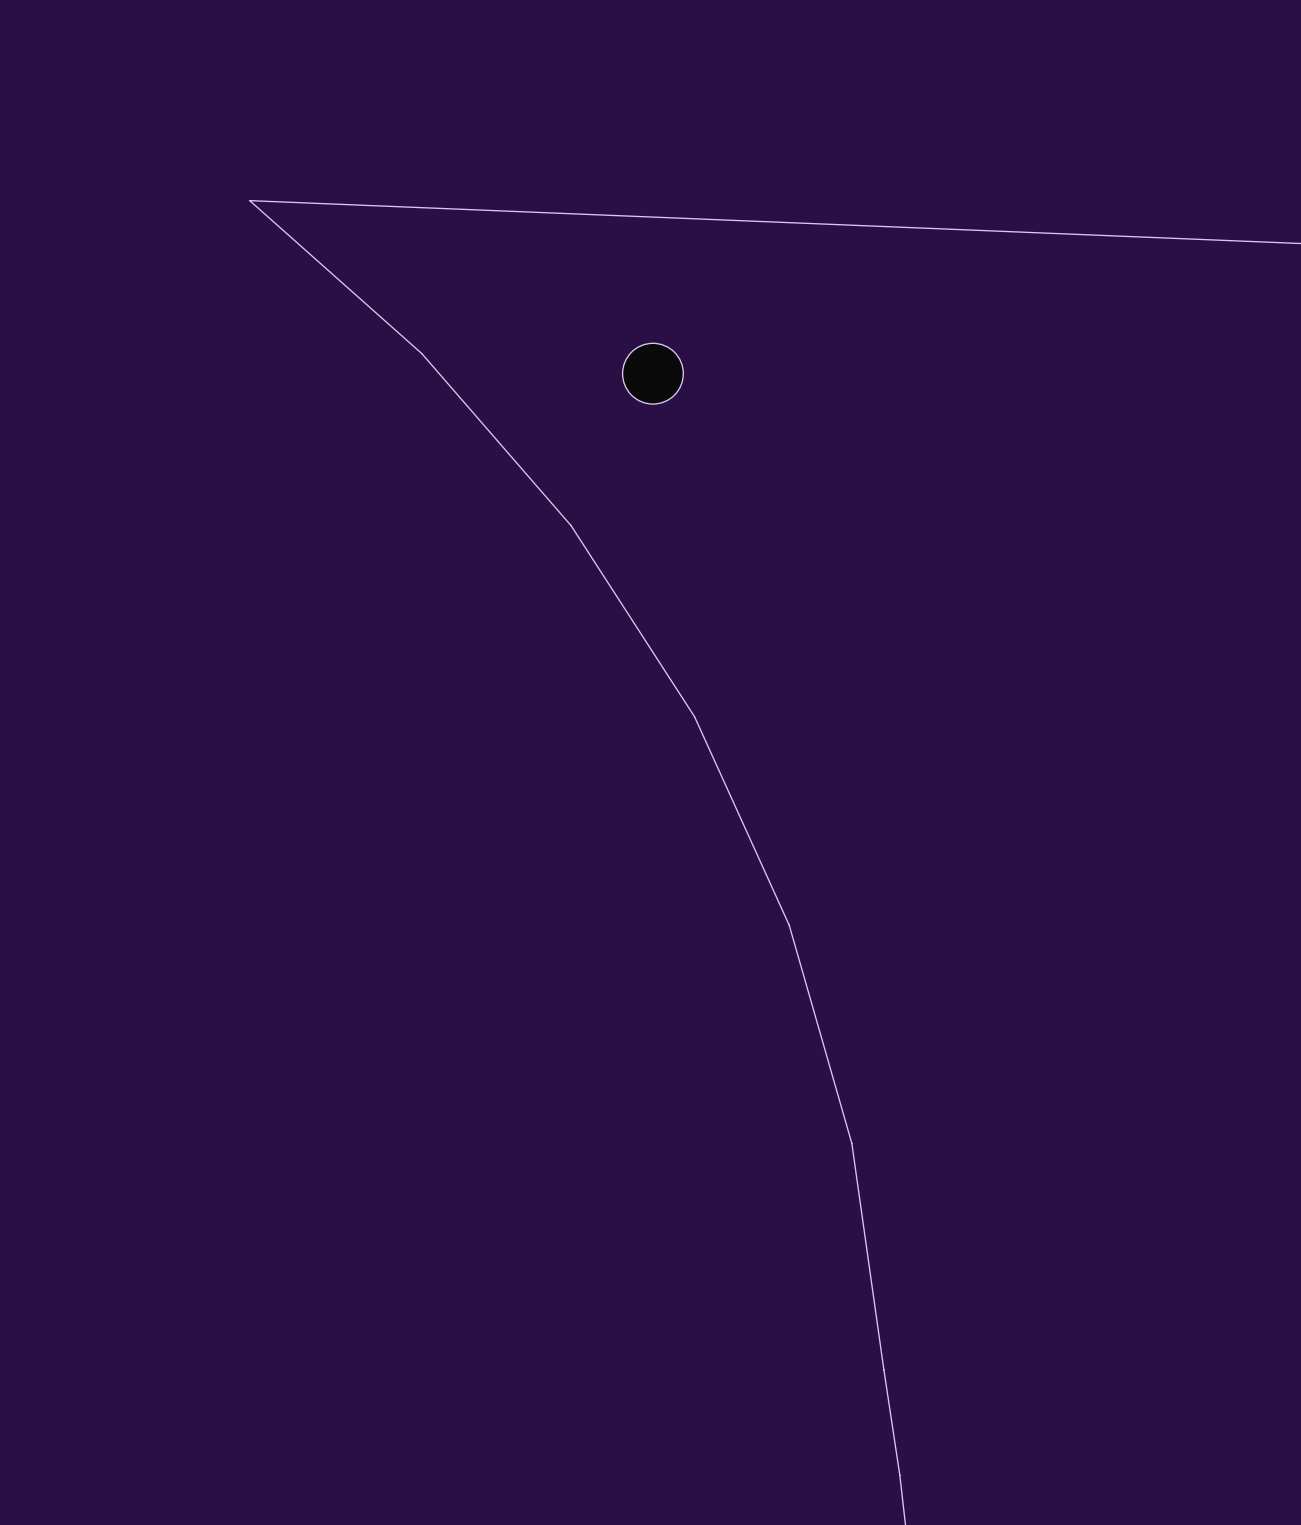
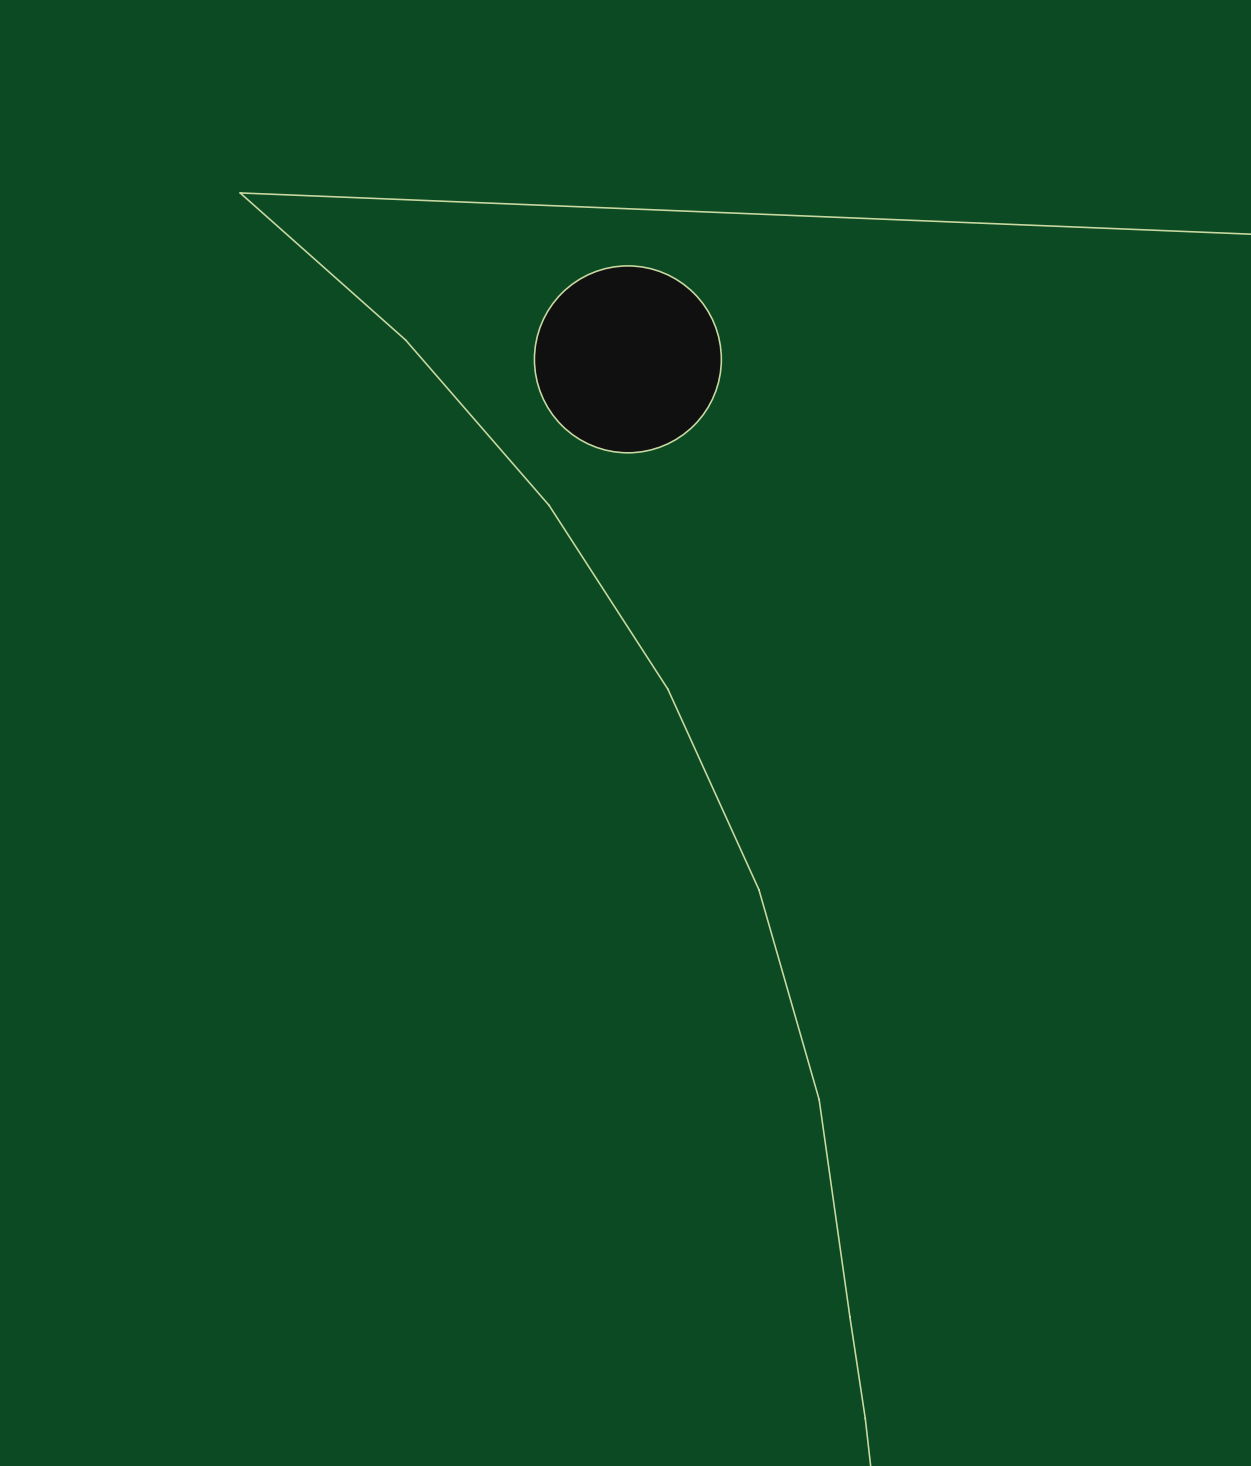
hole size: [622, 343, 684, 405] -> [534, 265, 722, 453]

